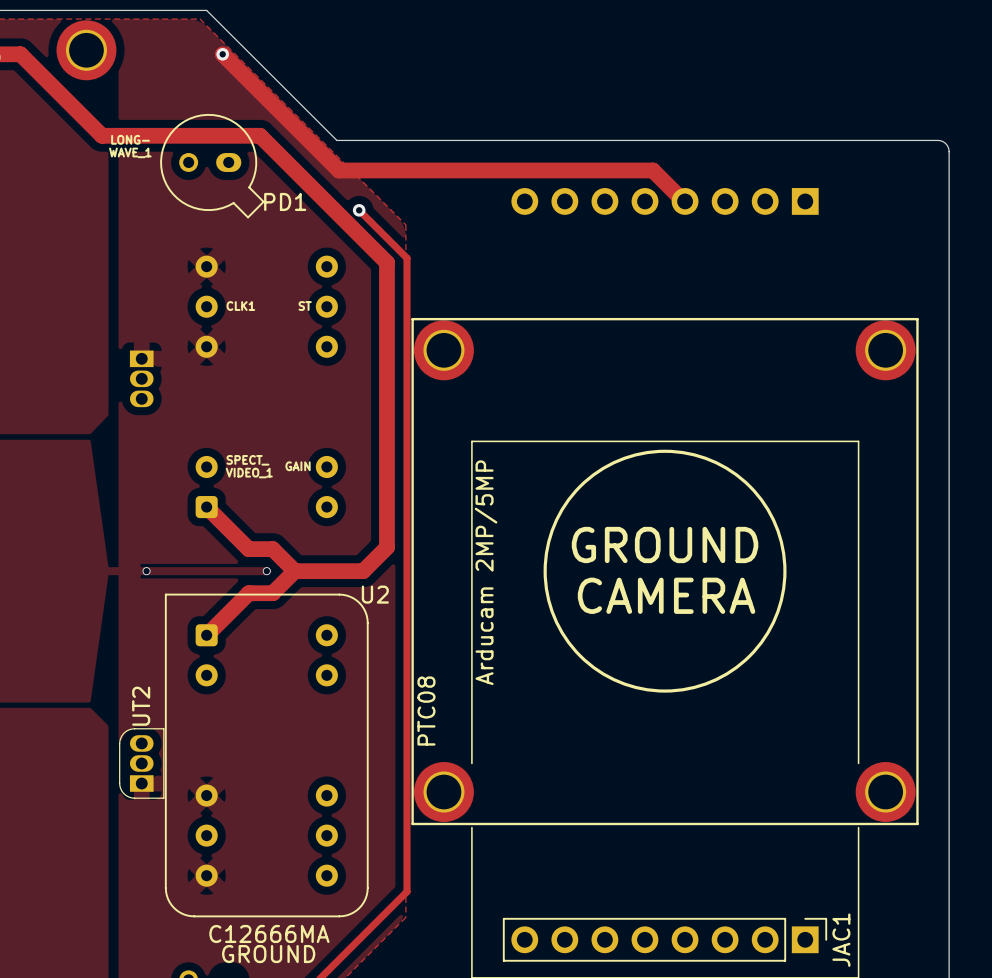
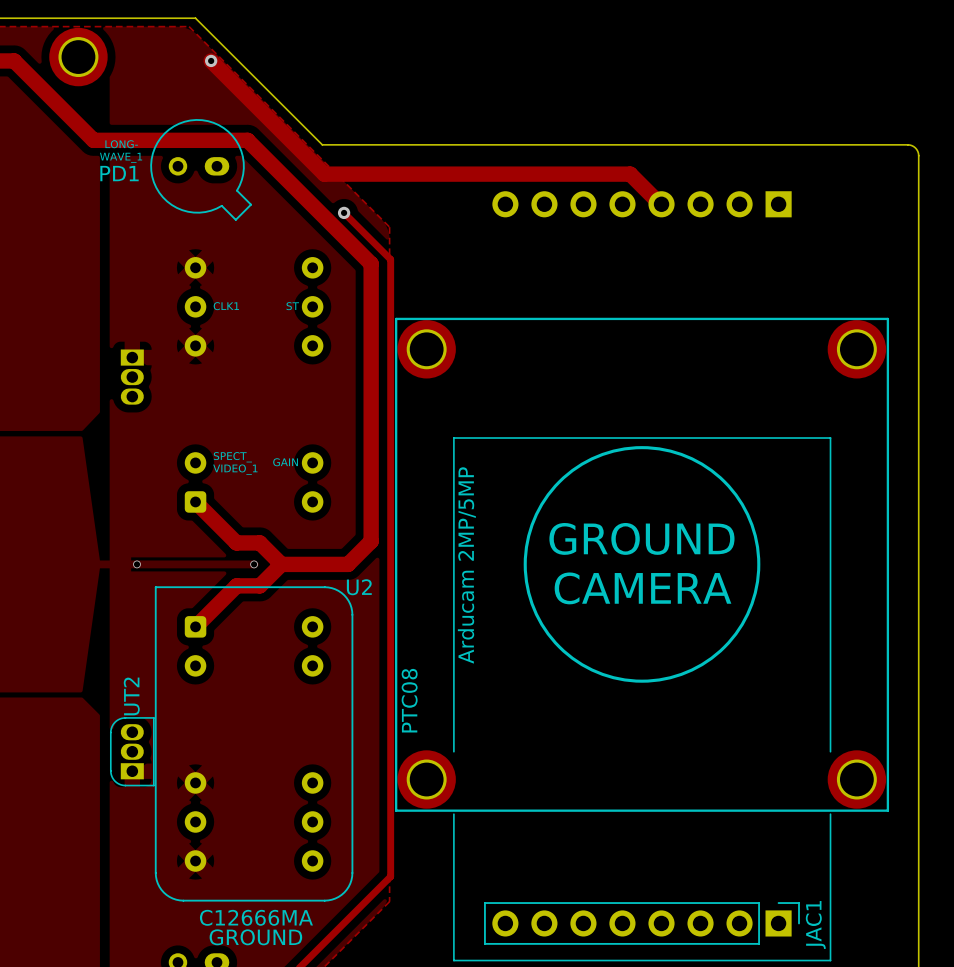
PD1 name position: PD1 (285, 201) -> PD1 (119, 173)

